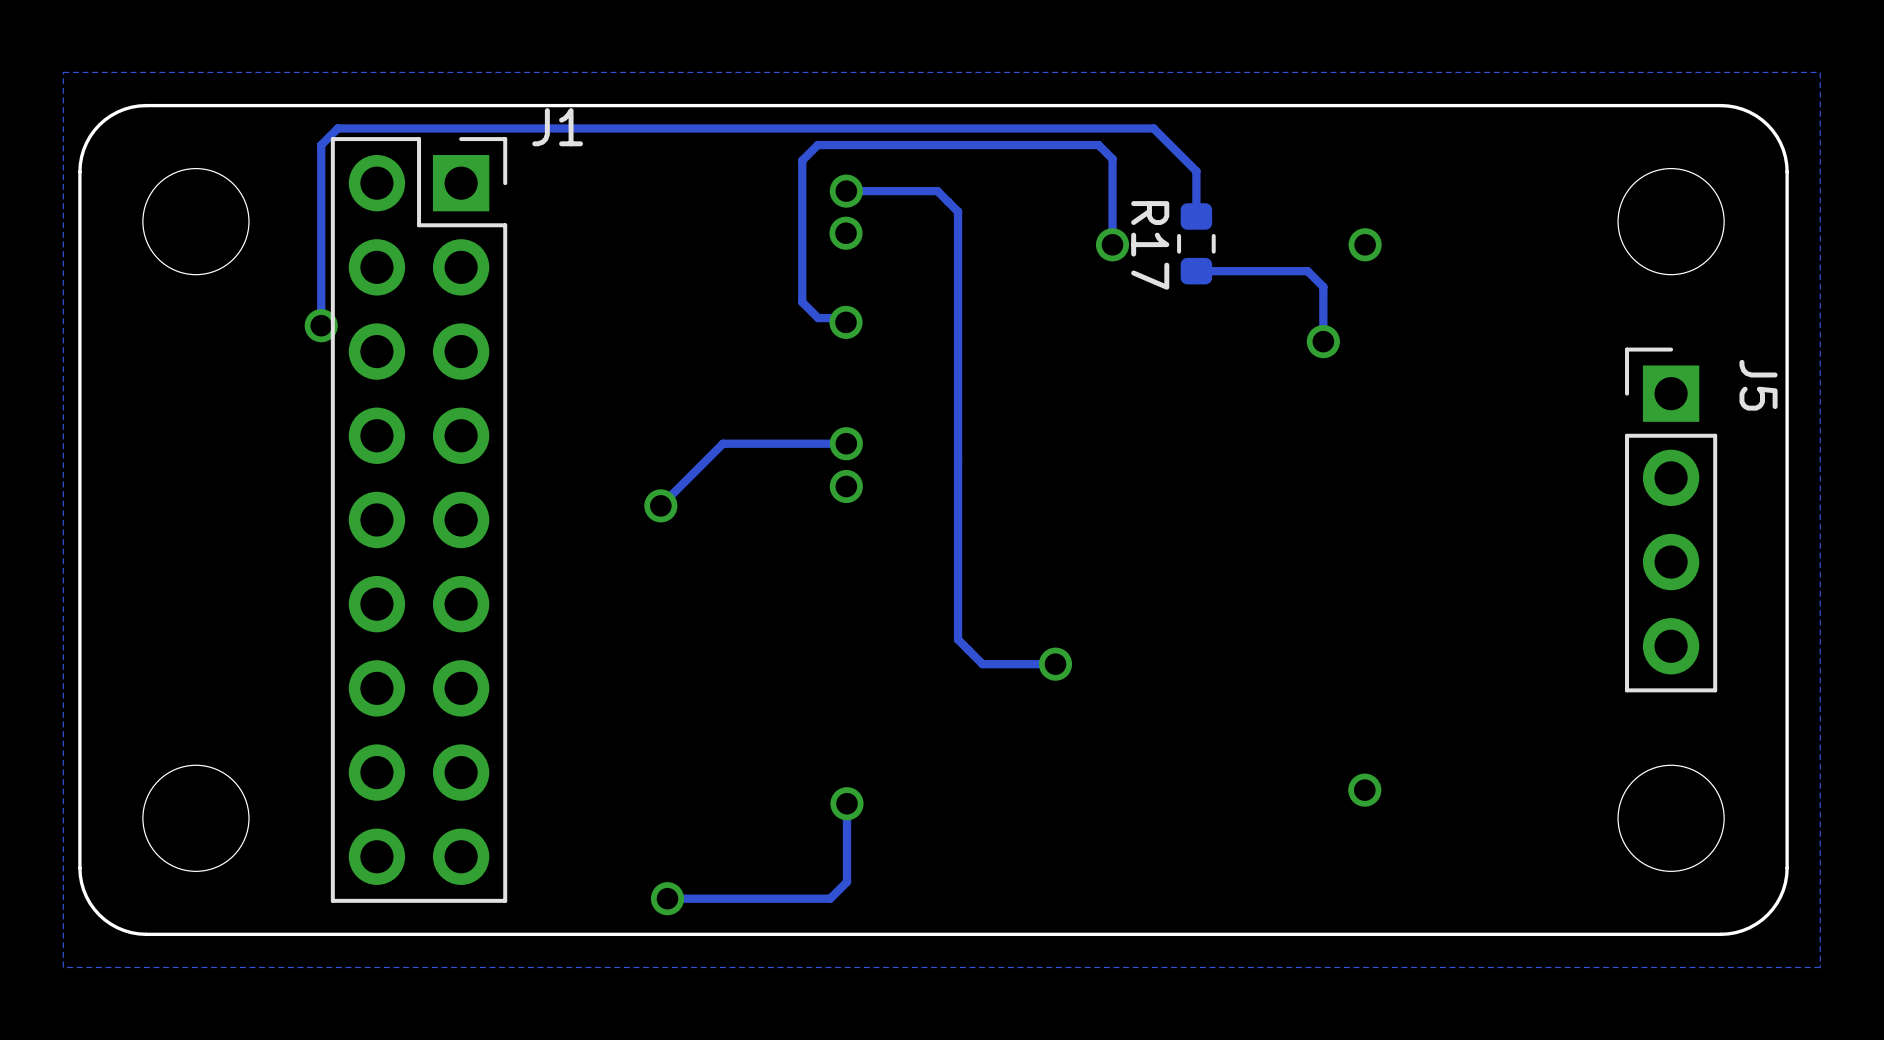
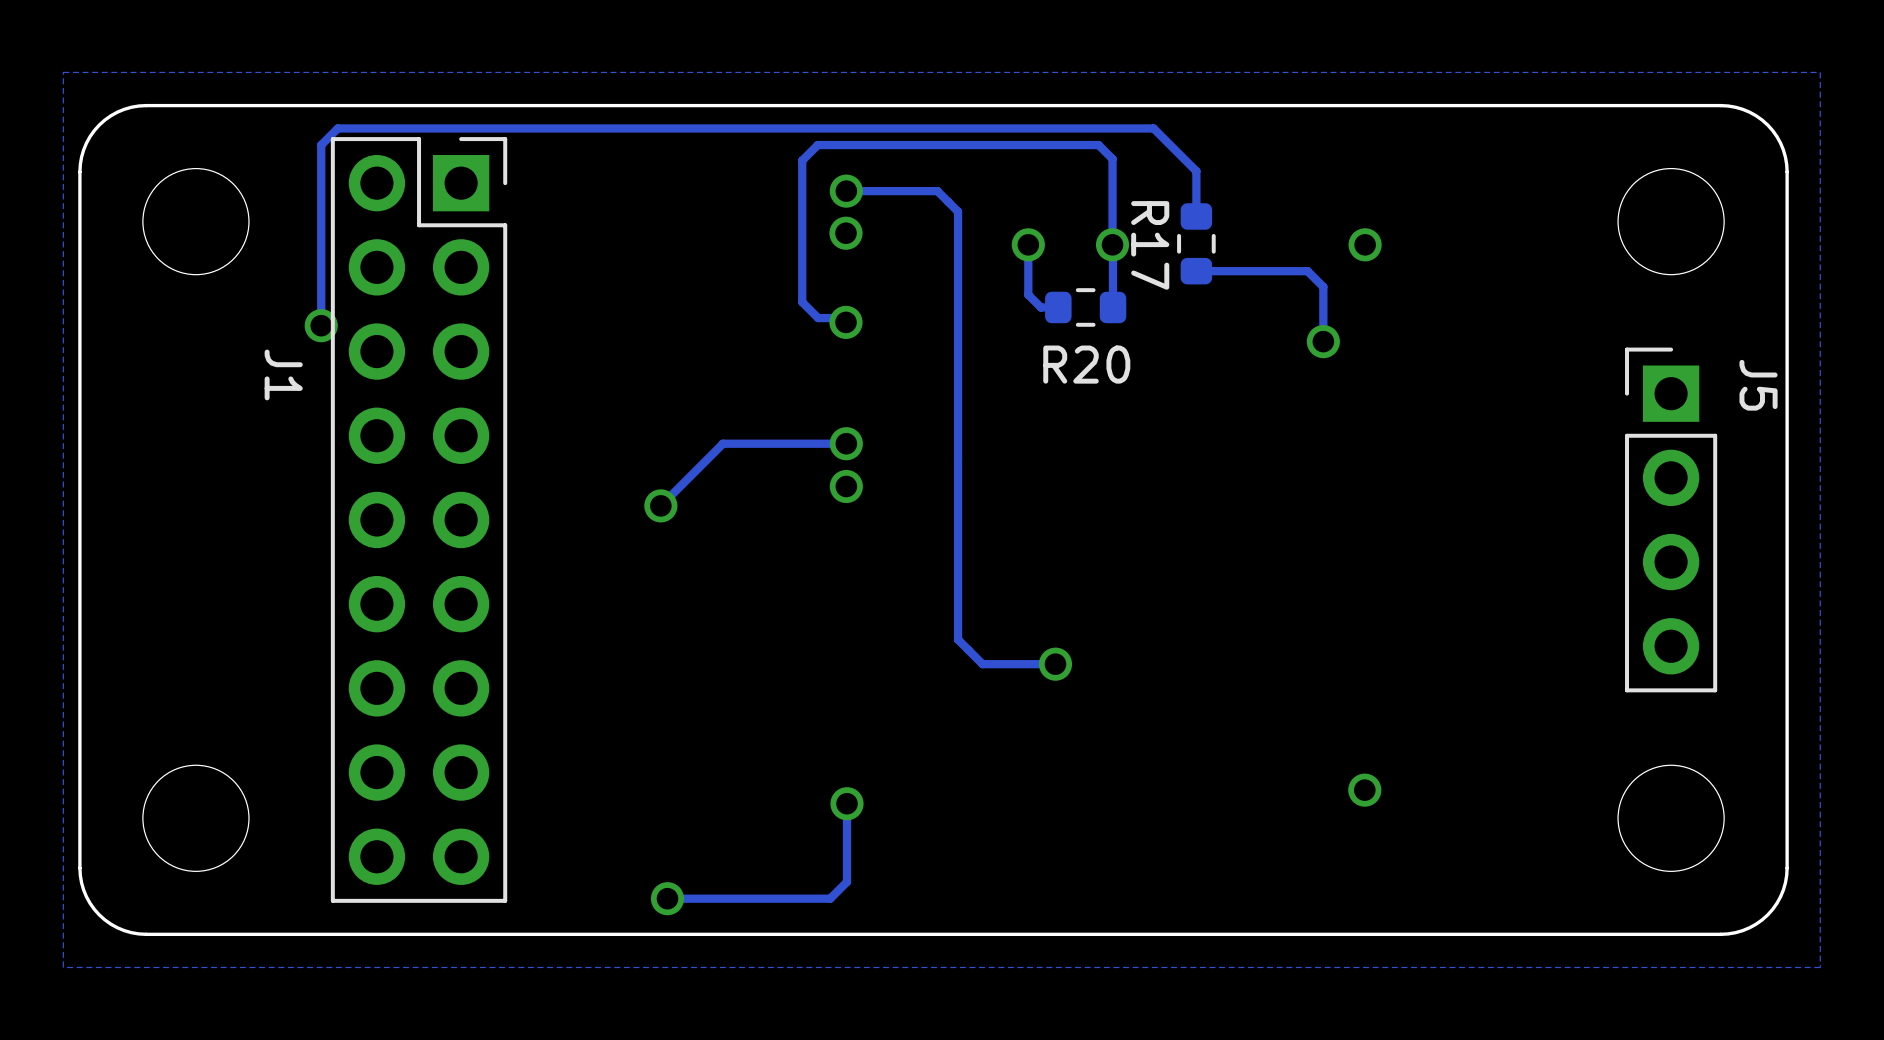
J1 name rotation: 0° (557, 127) -> 90° clockwise (283, 374)
J1 name position: J1 (557, 127) -> J1 (283, 374)
track: none -> (1028, 244) (1028, 294) (1040, 307) (1058, 307)
via: none -> (1028, 244)
track: none -> (1112, 244) (1113, 307)
R20: none -> (1085, 307)

